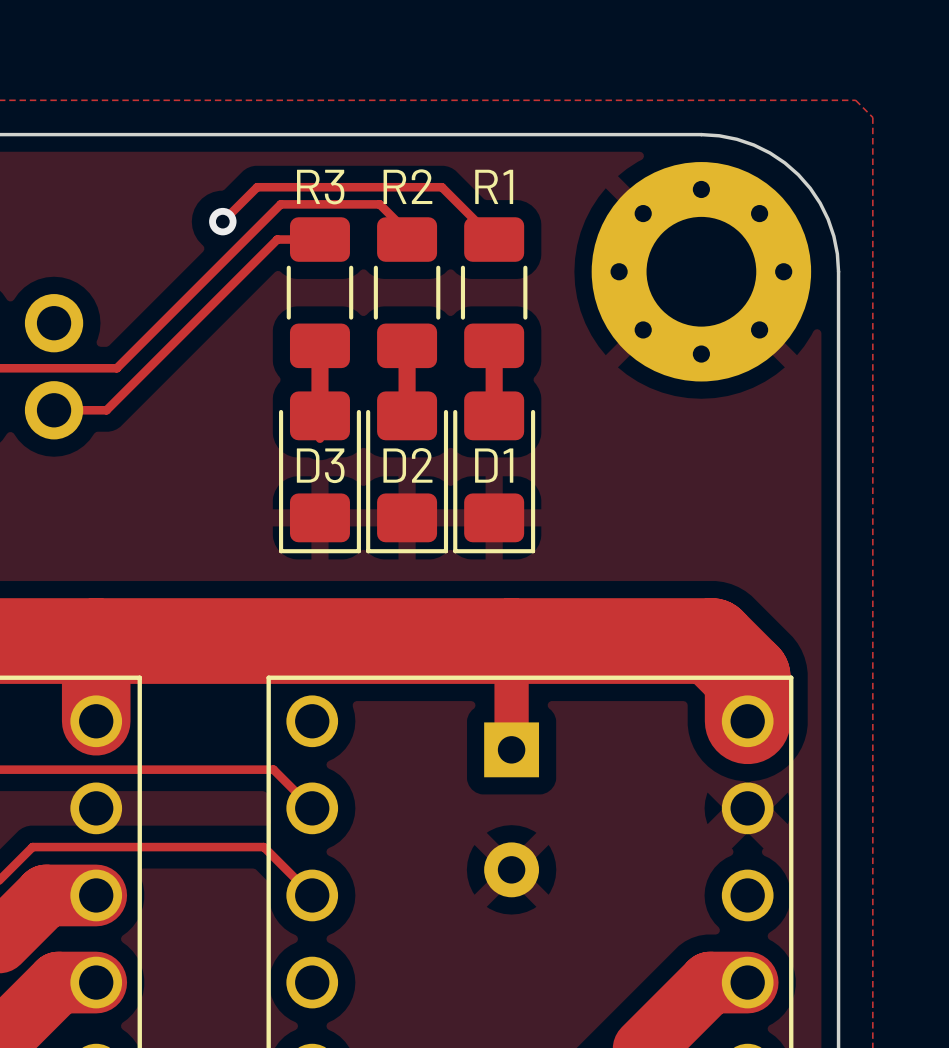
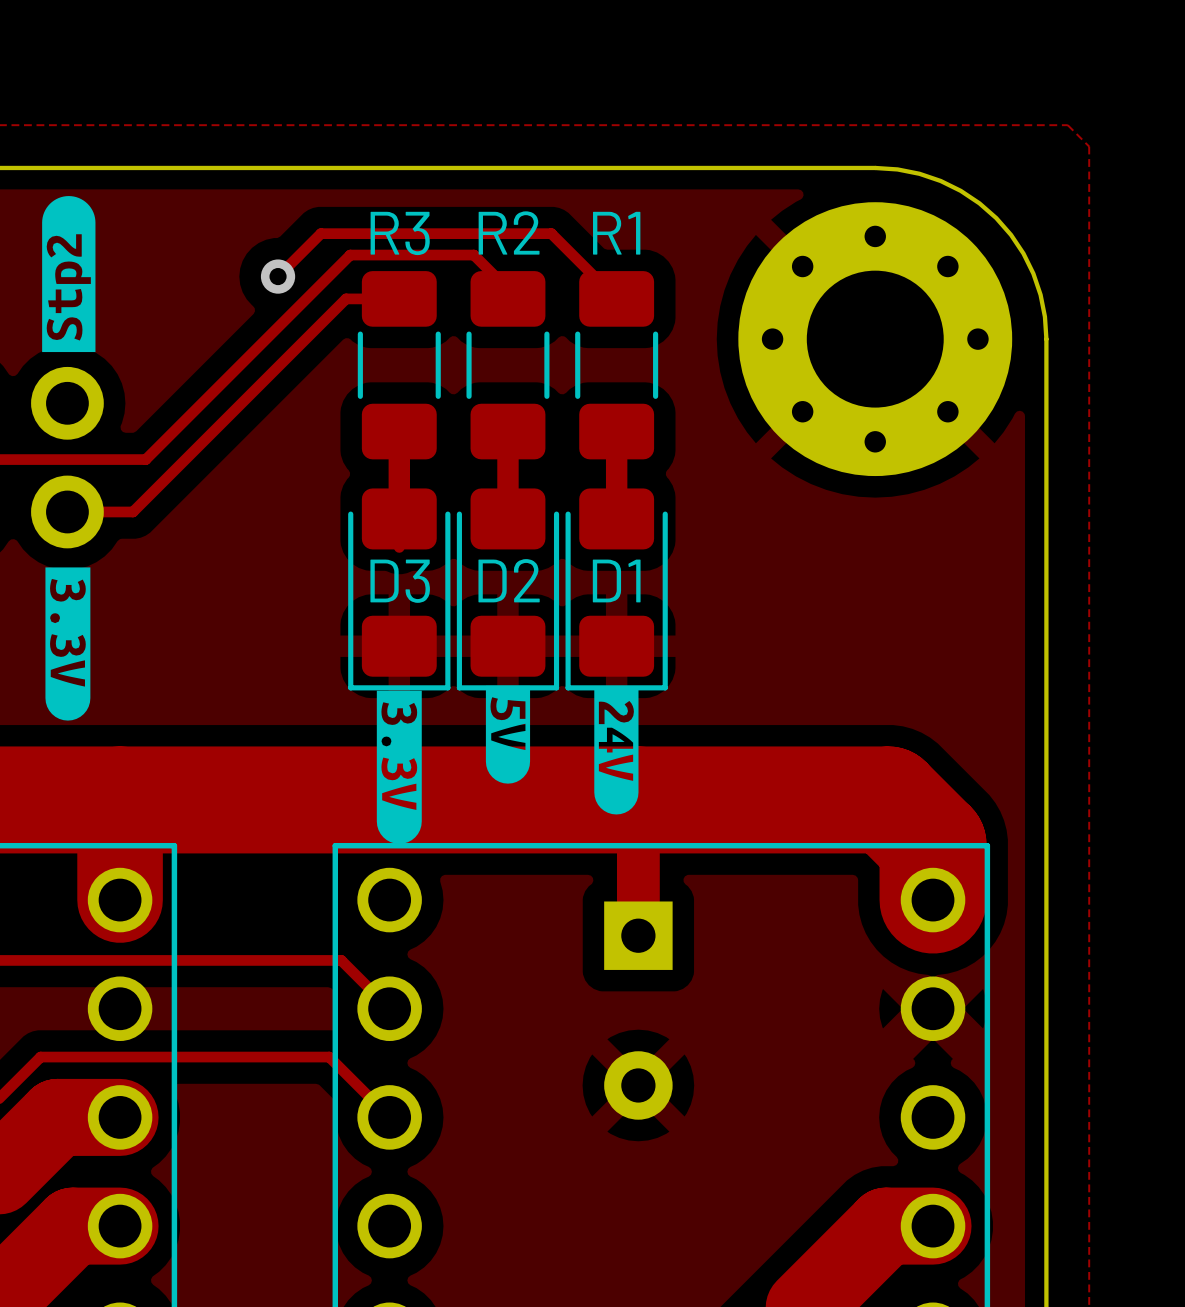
drawing: none -> [42, 196, 96, 353]
drawing: none -> [45, 567, 91, 721]
drawing: none -> [485, 685, 531, 784]
drawing: none -> [594, 689, 639, 815]
drawing: none -> [376, 690, 422, 844]

